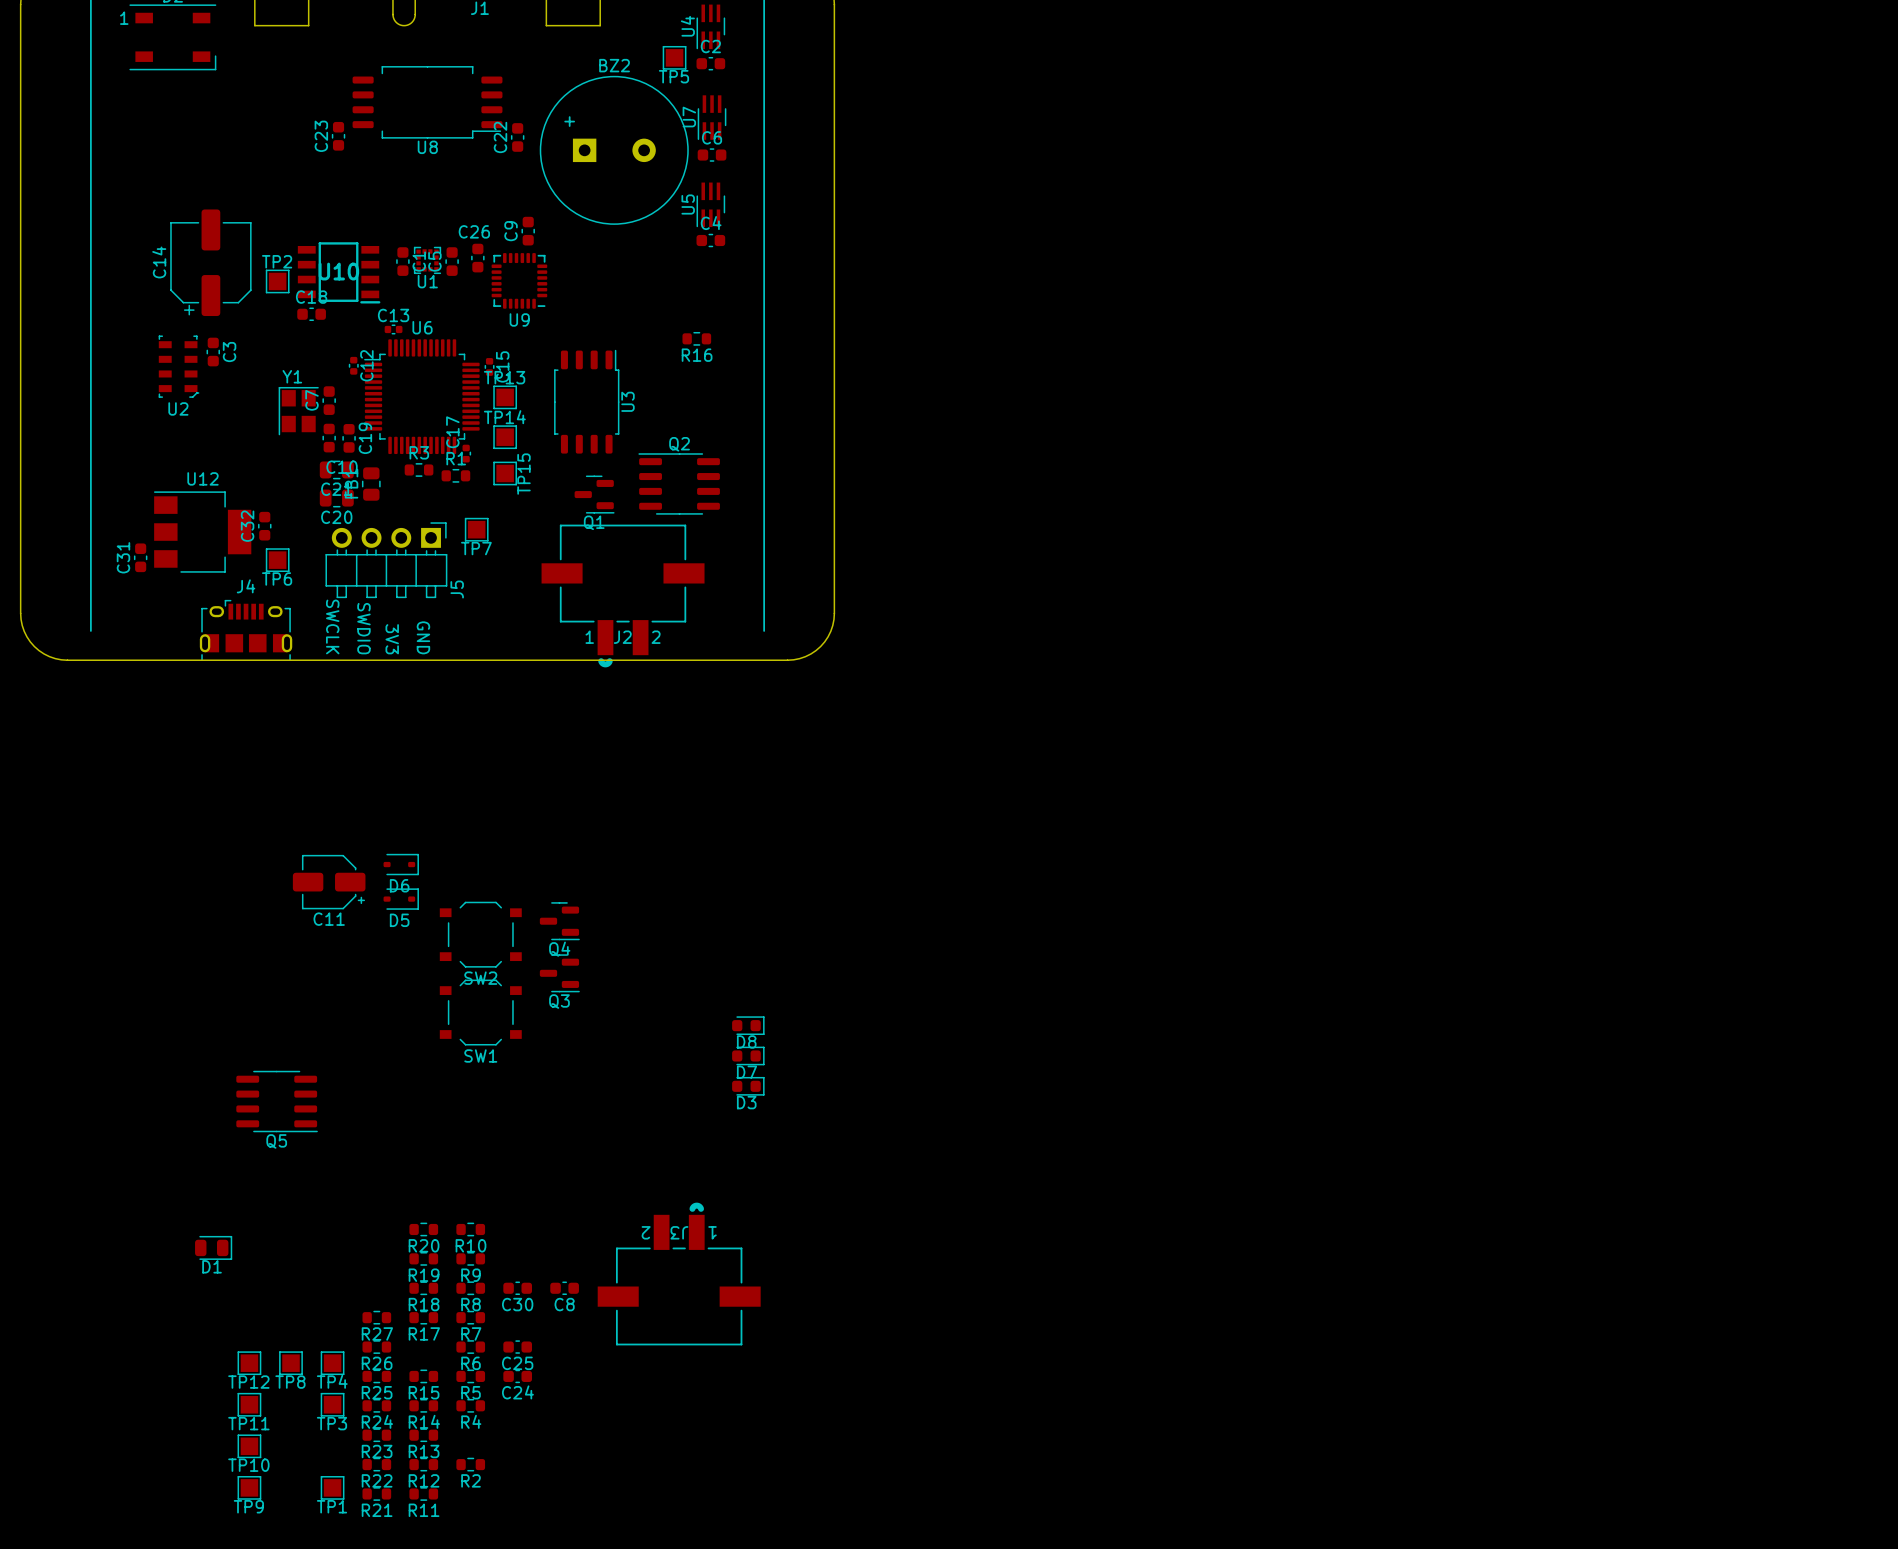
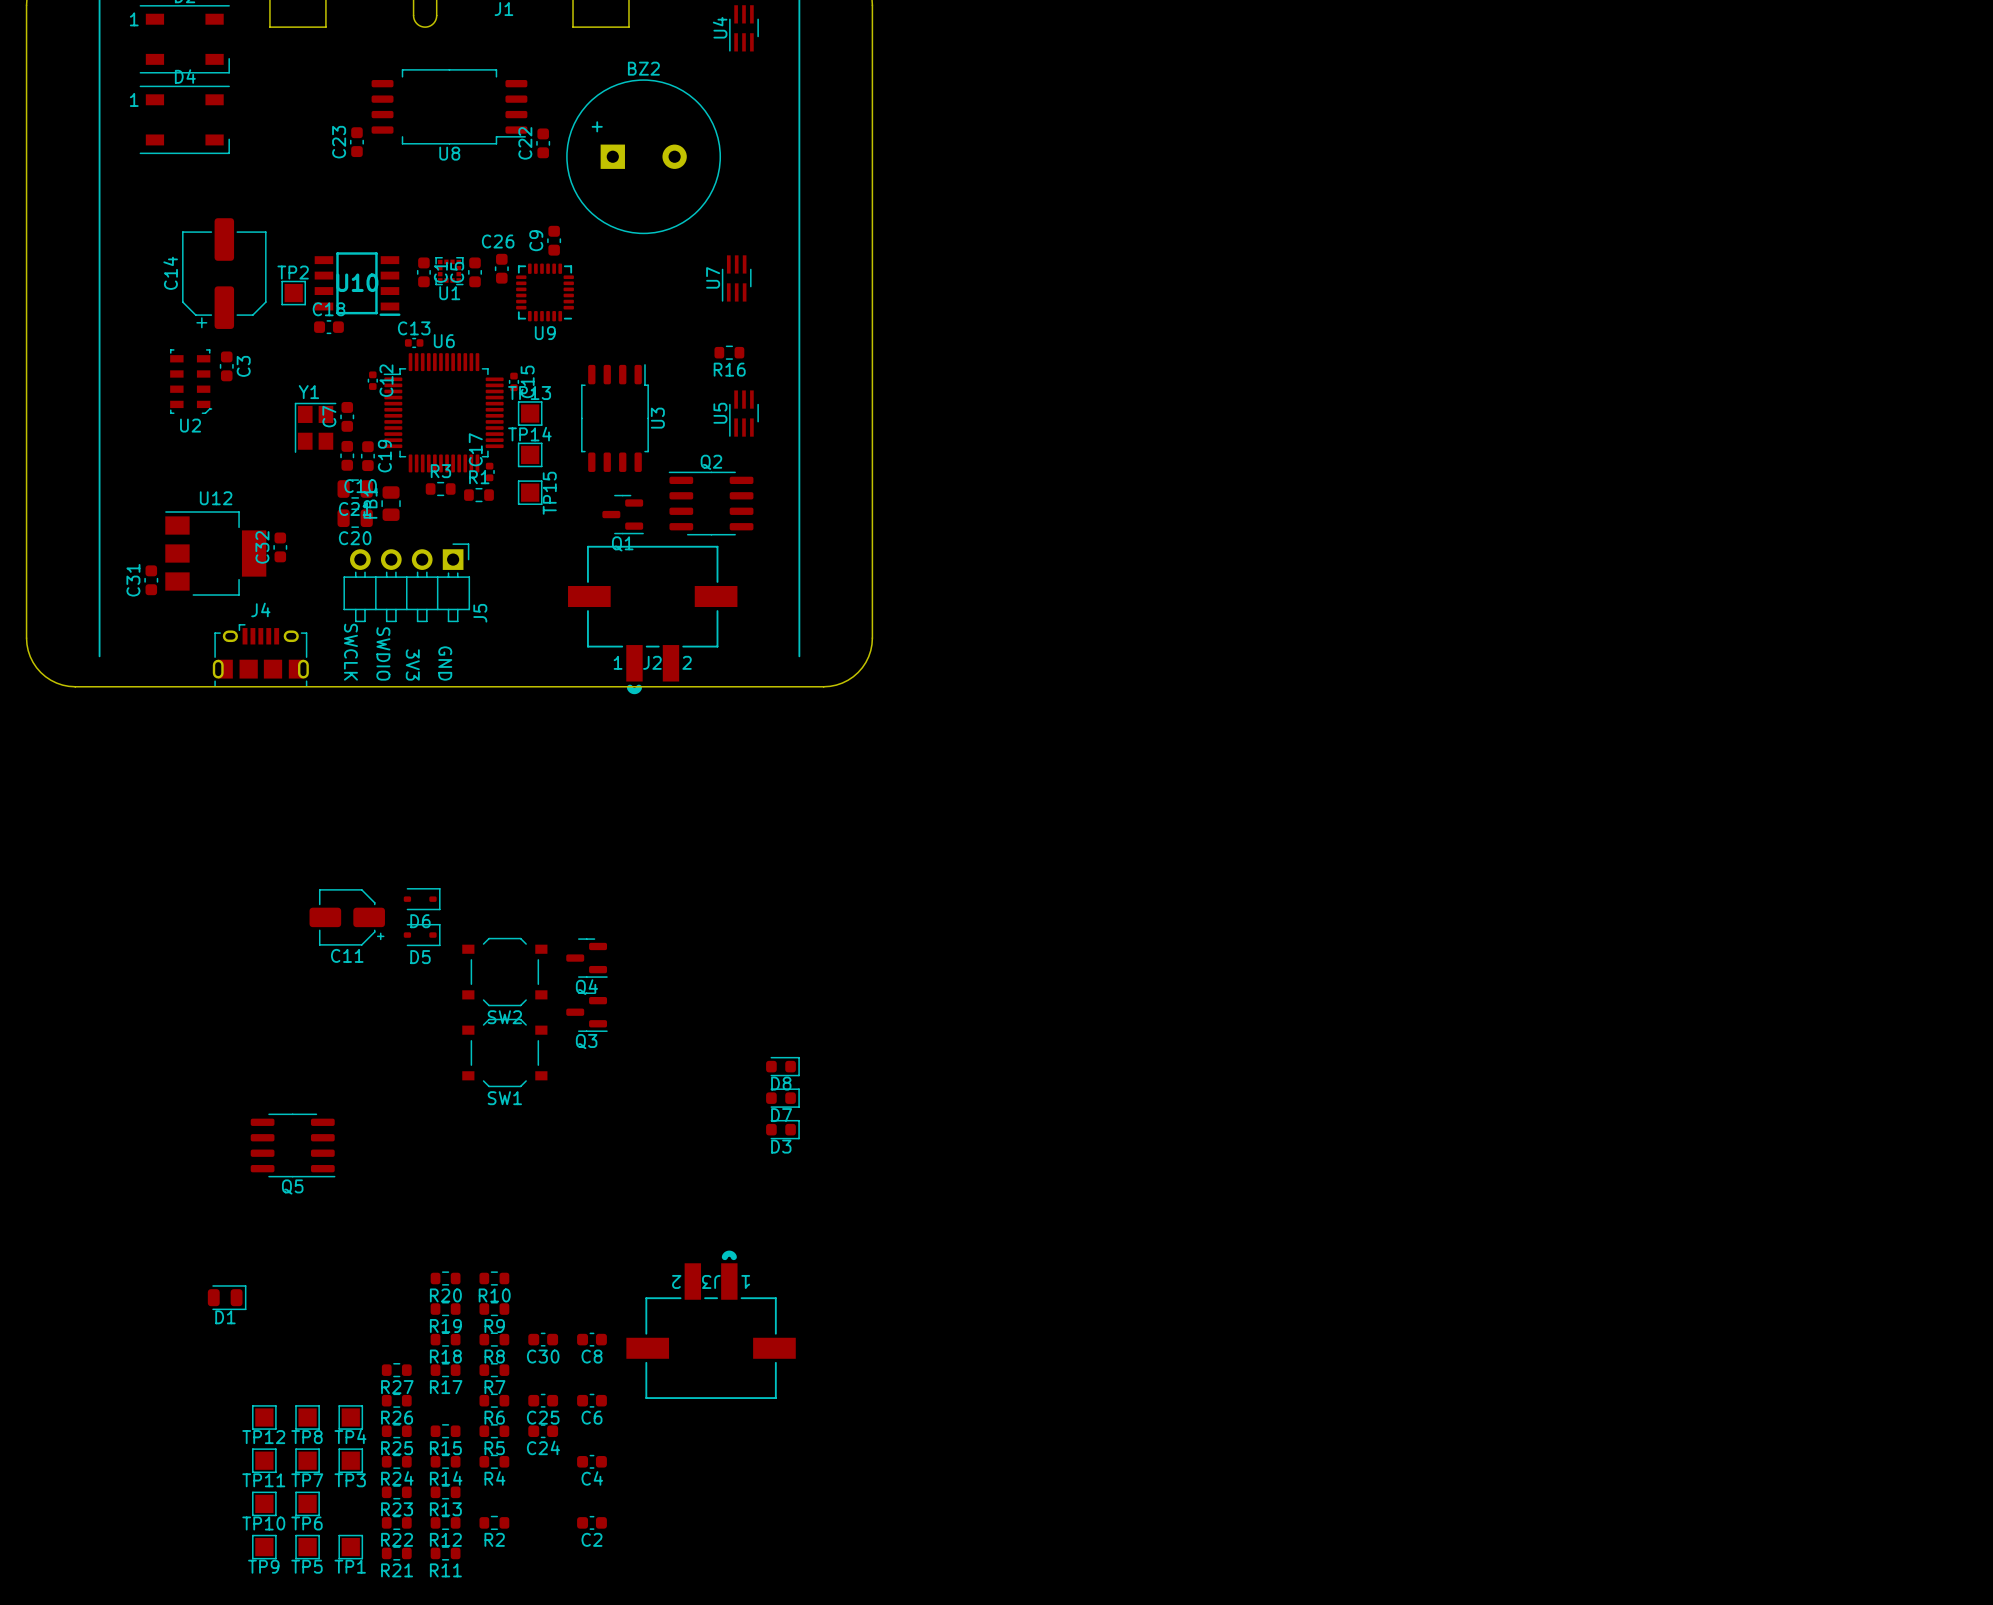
C2 name position: C2 (710, 46) -> C2 (591, 1539)
TP5 position: (674, 57) -> (307, 1547)
C2 position: (710, 63) -> (591, 1522)
D4: none -> (184, 119)
U7 position: (712, 117) -> (736, 278)
C6 name position: C6 (712, 137) -> C6 (591, 1417)
C6 position: (712, 155) -> (591, 1400)
U5 position: (710, 204) -> (744, 413)
C4 name position: C4 (711, 223) -> C4 (592, 1478)
C4 position: (710, 240) -> (591, 1461)
TP7 position: (476, 529) -> (307, 1460)
TP6 position: (277, 560) -> (307, 1503)

